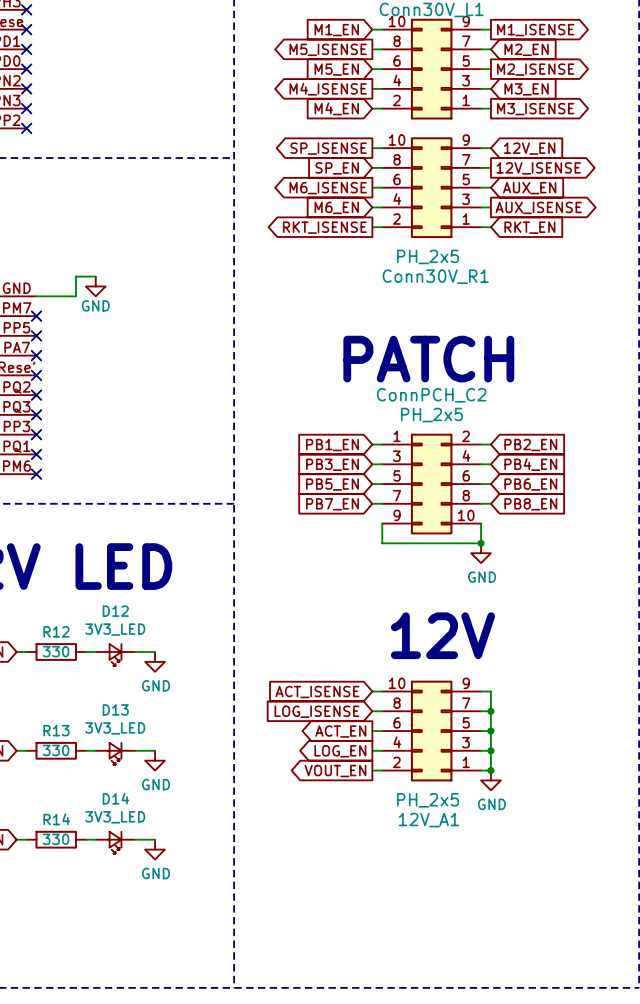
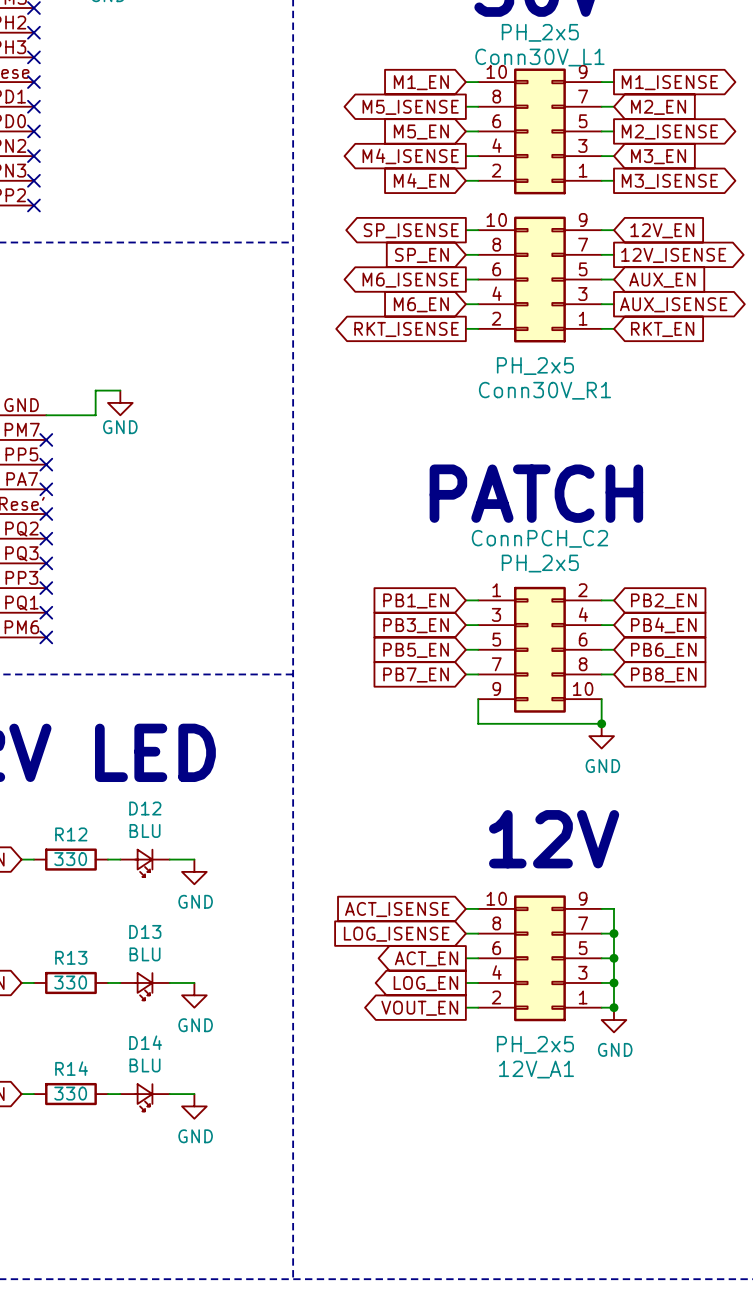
D12 value: 3V3_LED (115, 629) -> BLU (145, 830)
D13 value: 3V3_LED (115, 728) -> BLU (145, 954)
D14 value: 3V3_LED (115, 817) -> BLU (145, 1065)

